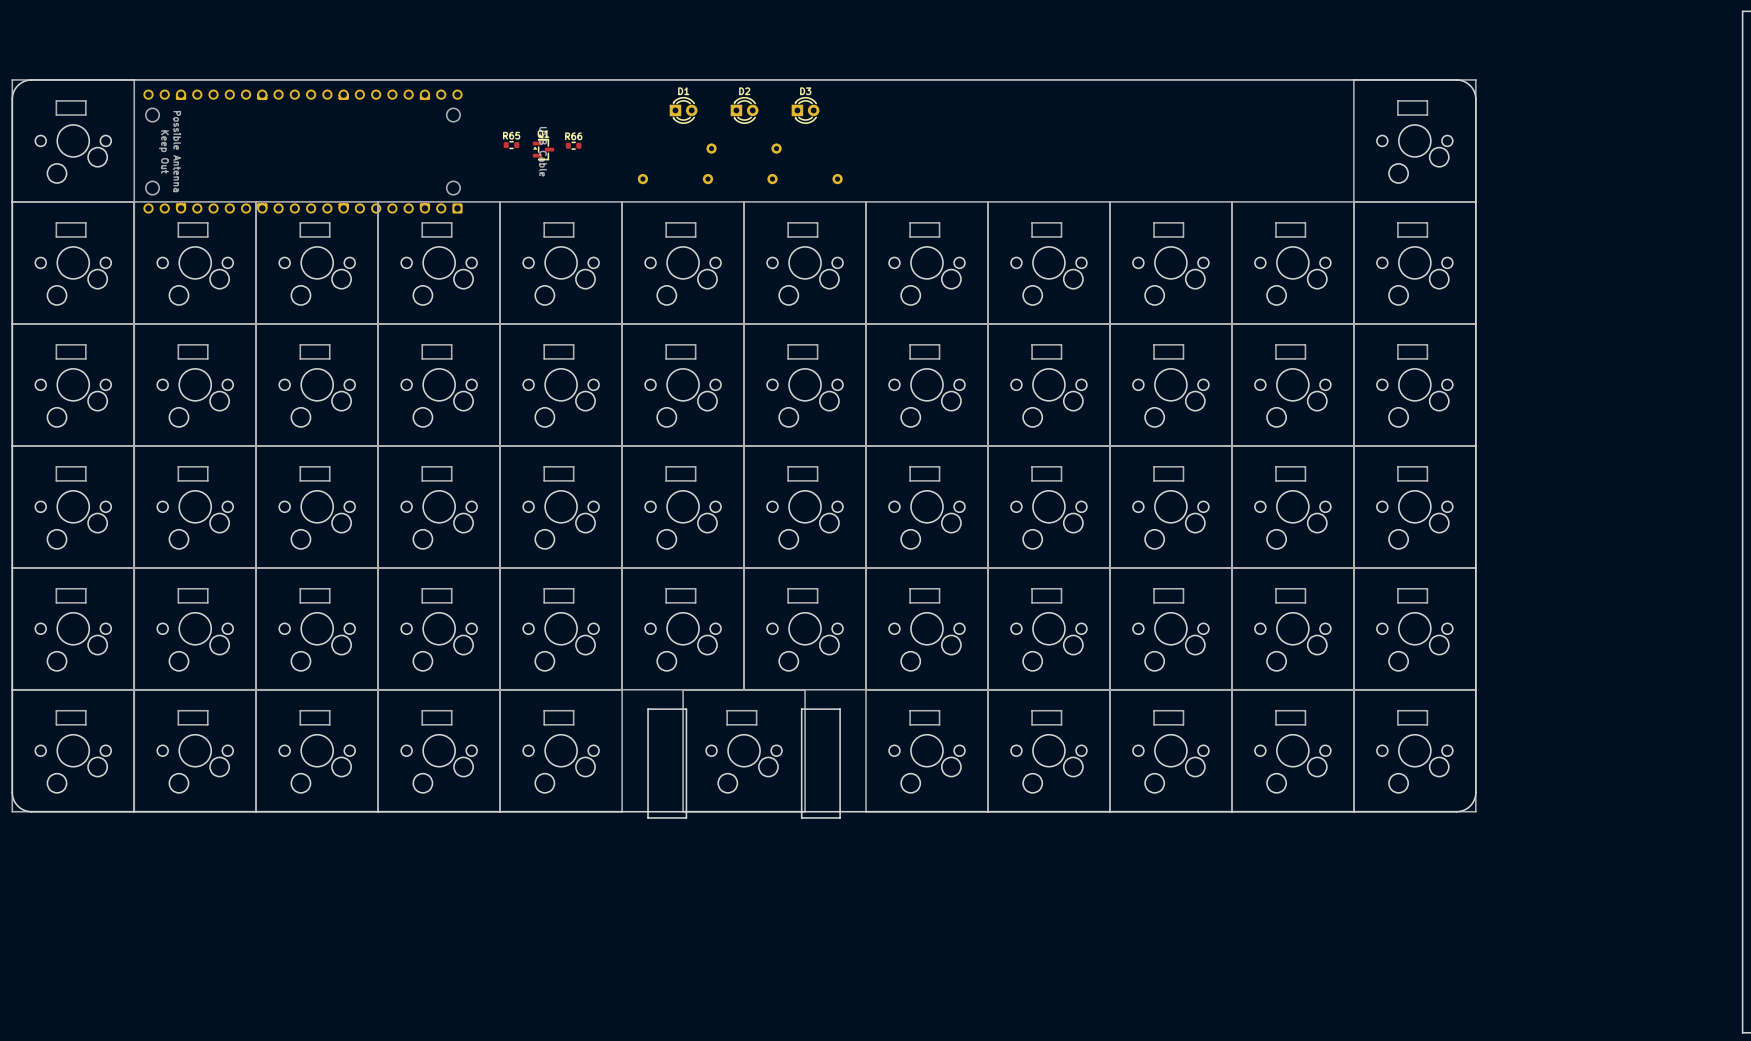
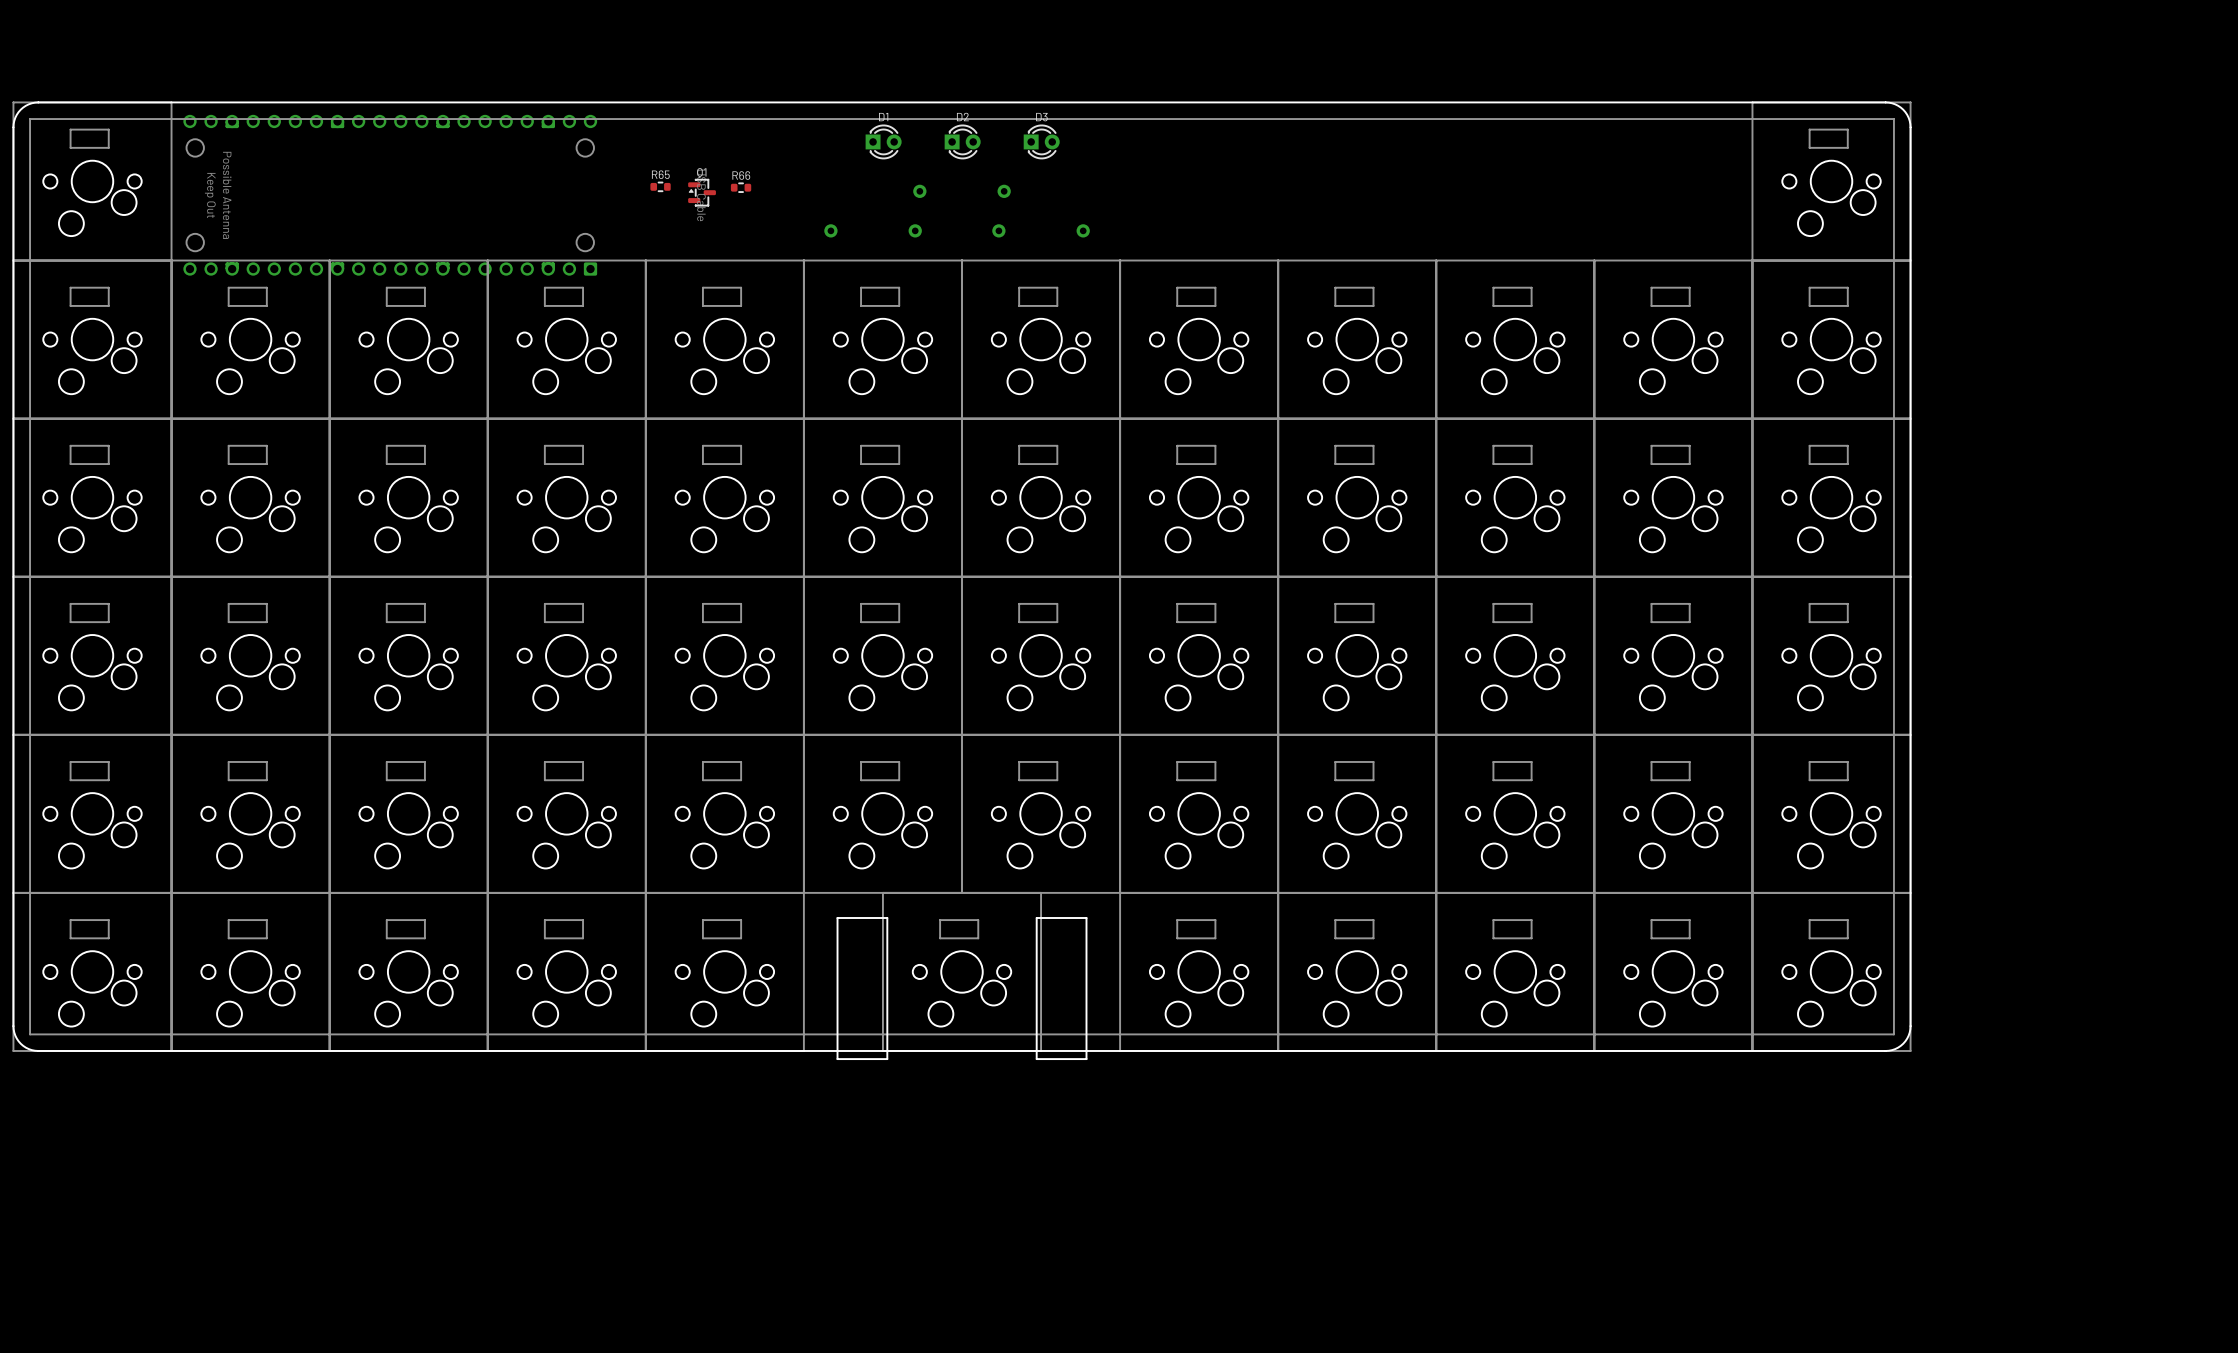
line: none -> (30, 119) (1893, 119) (1893, 1034) (30, 1034) (30, 119)

